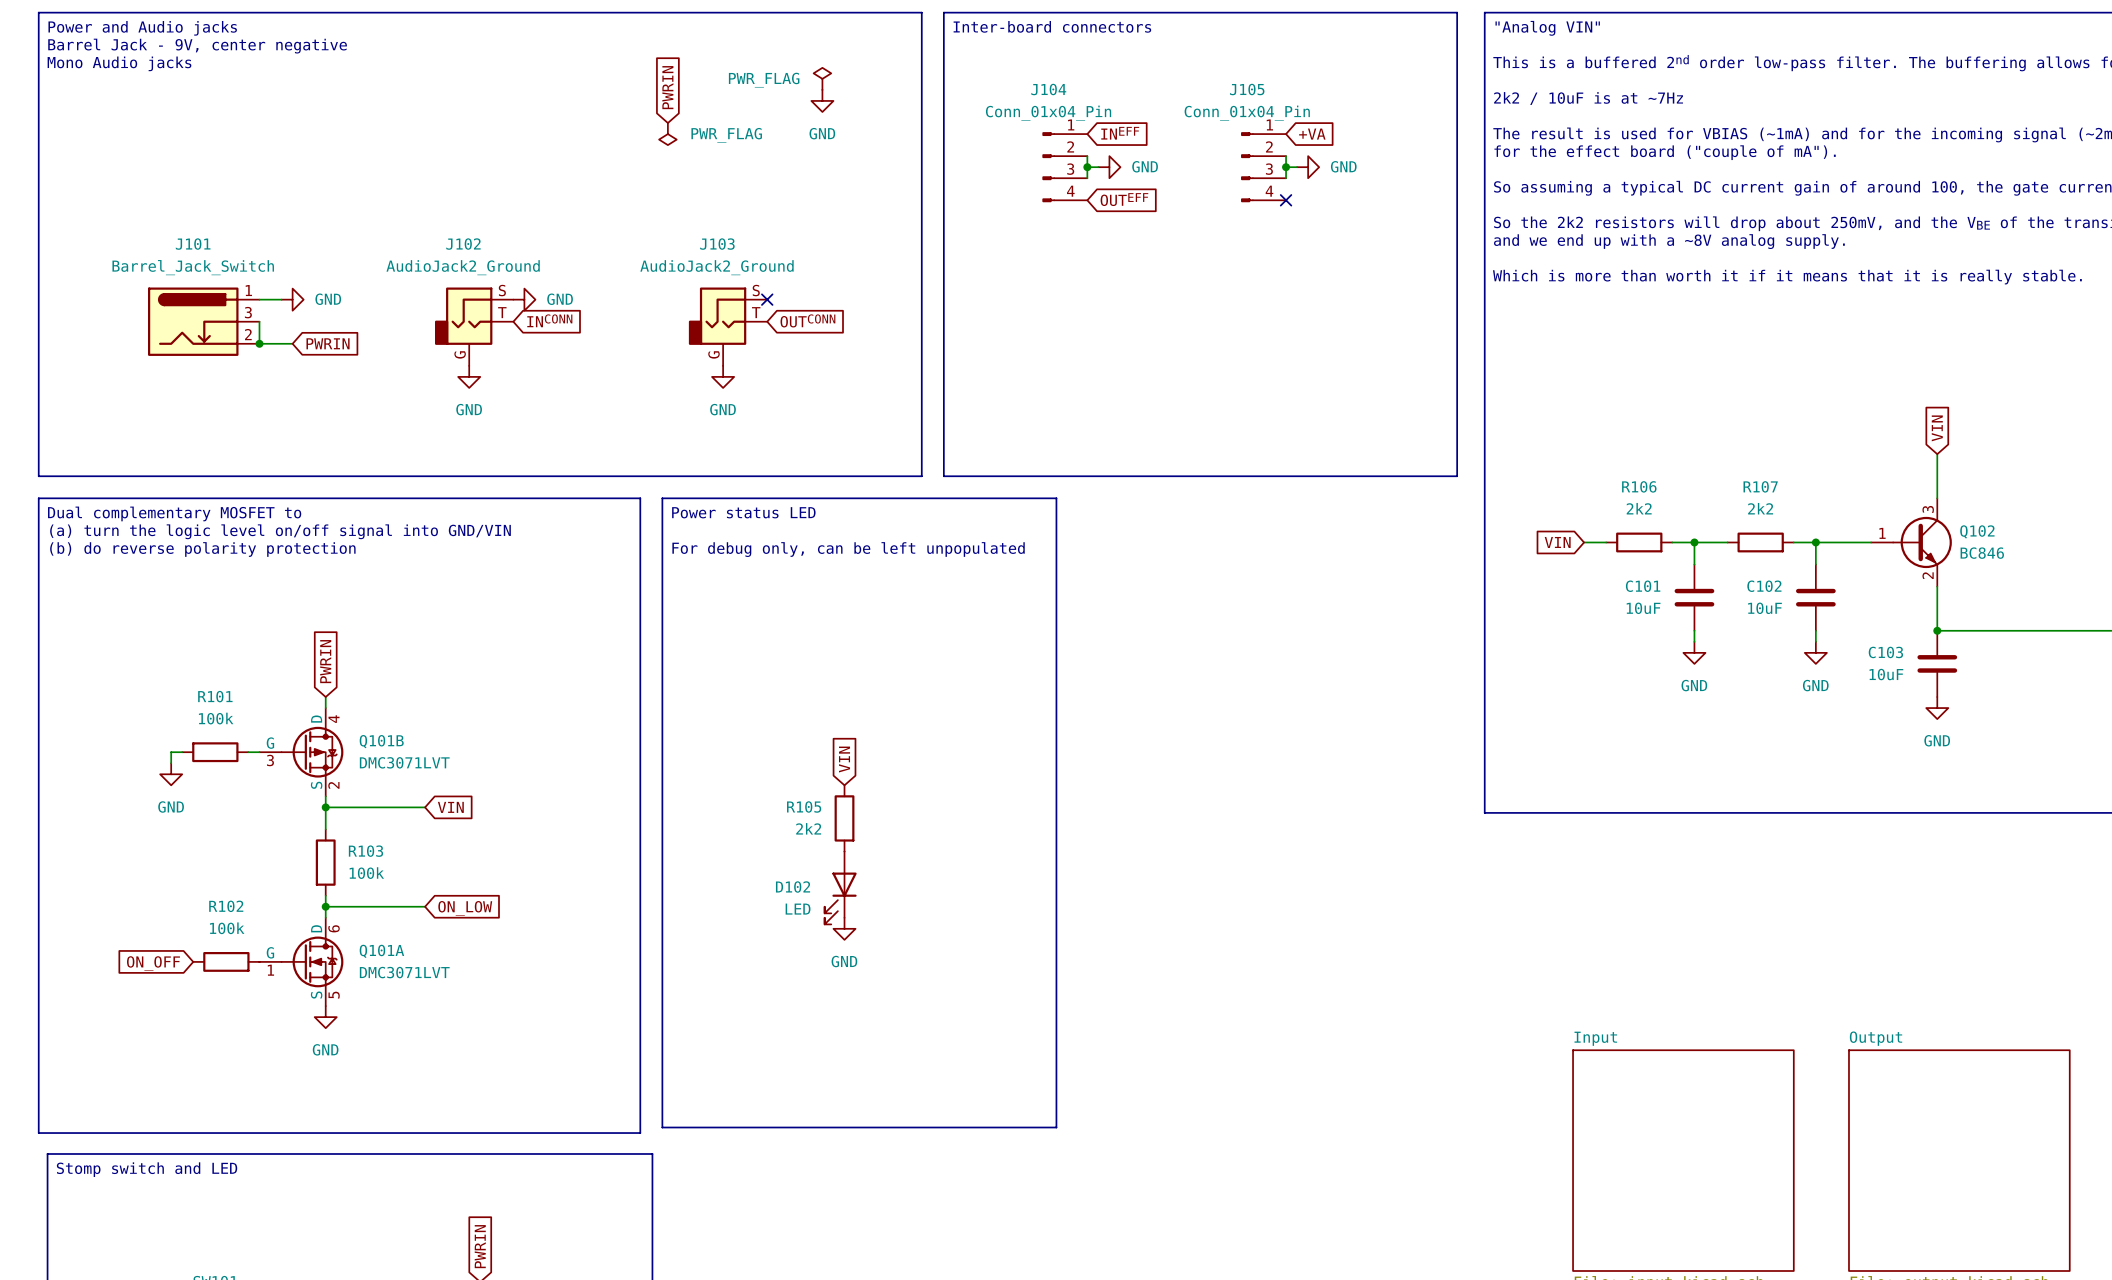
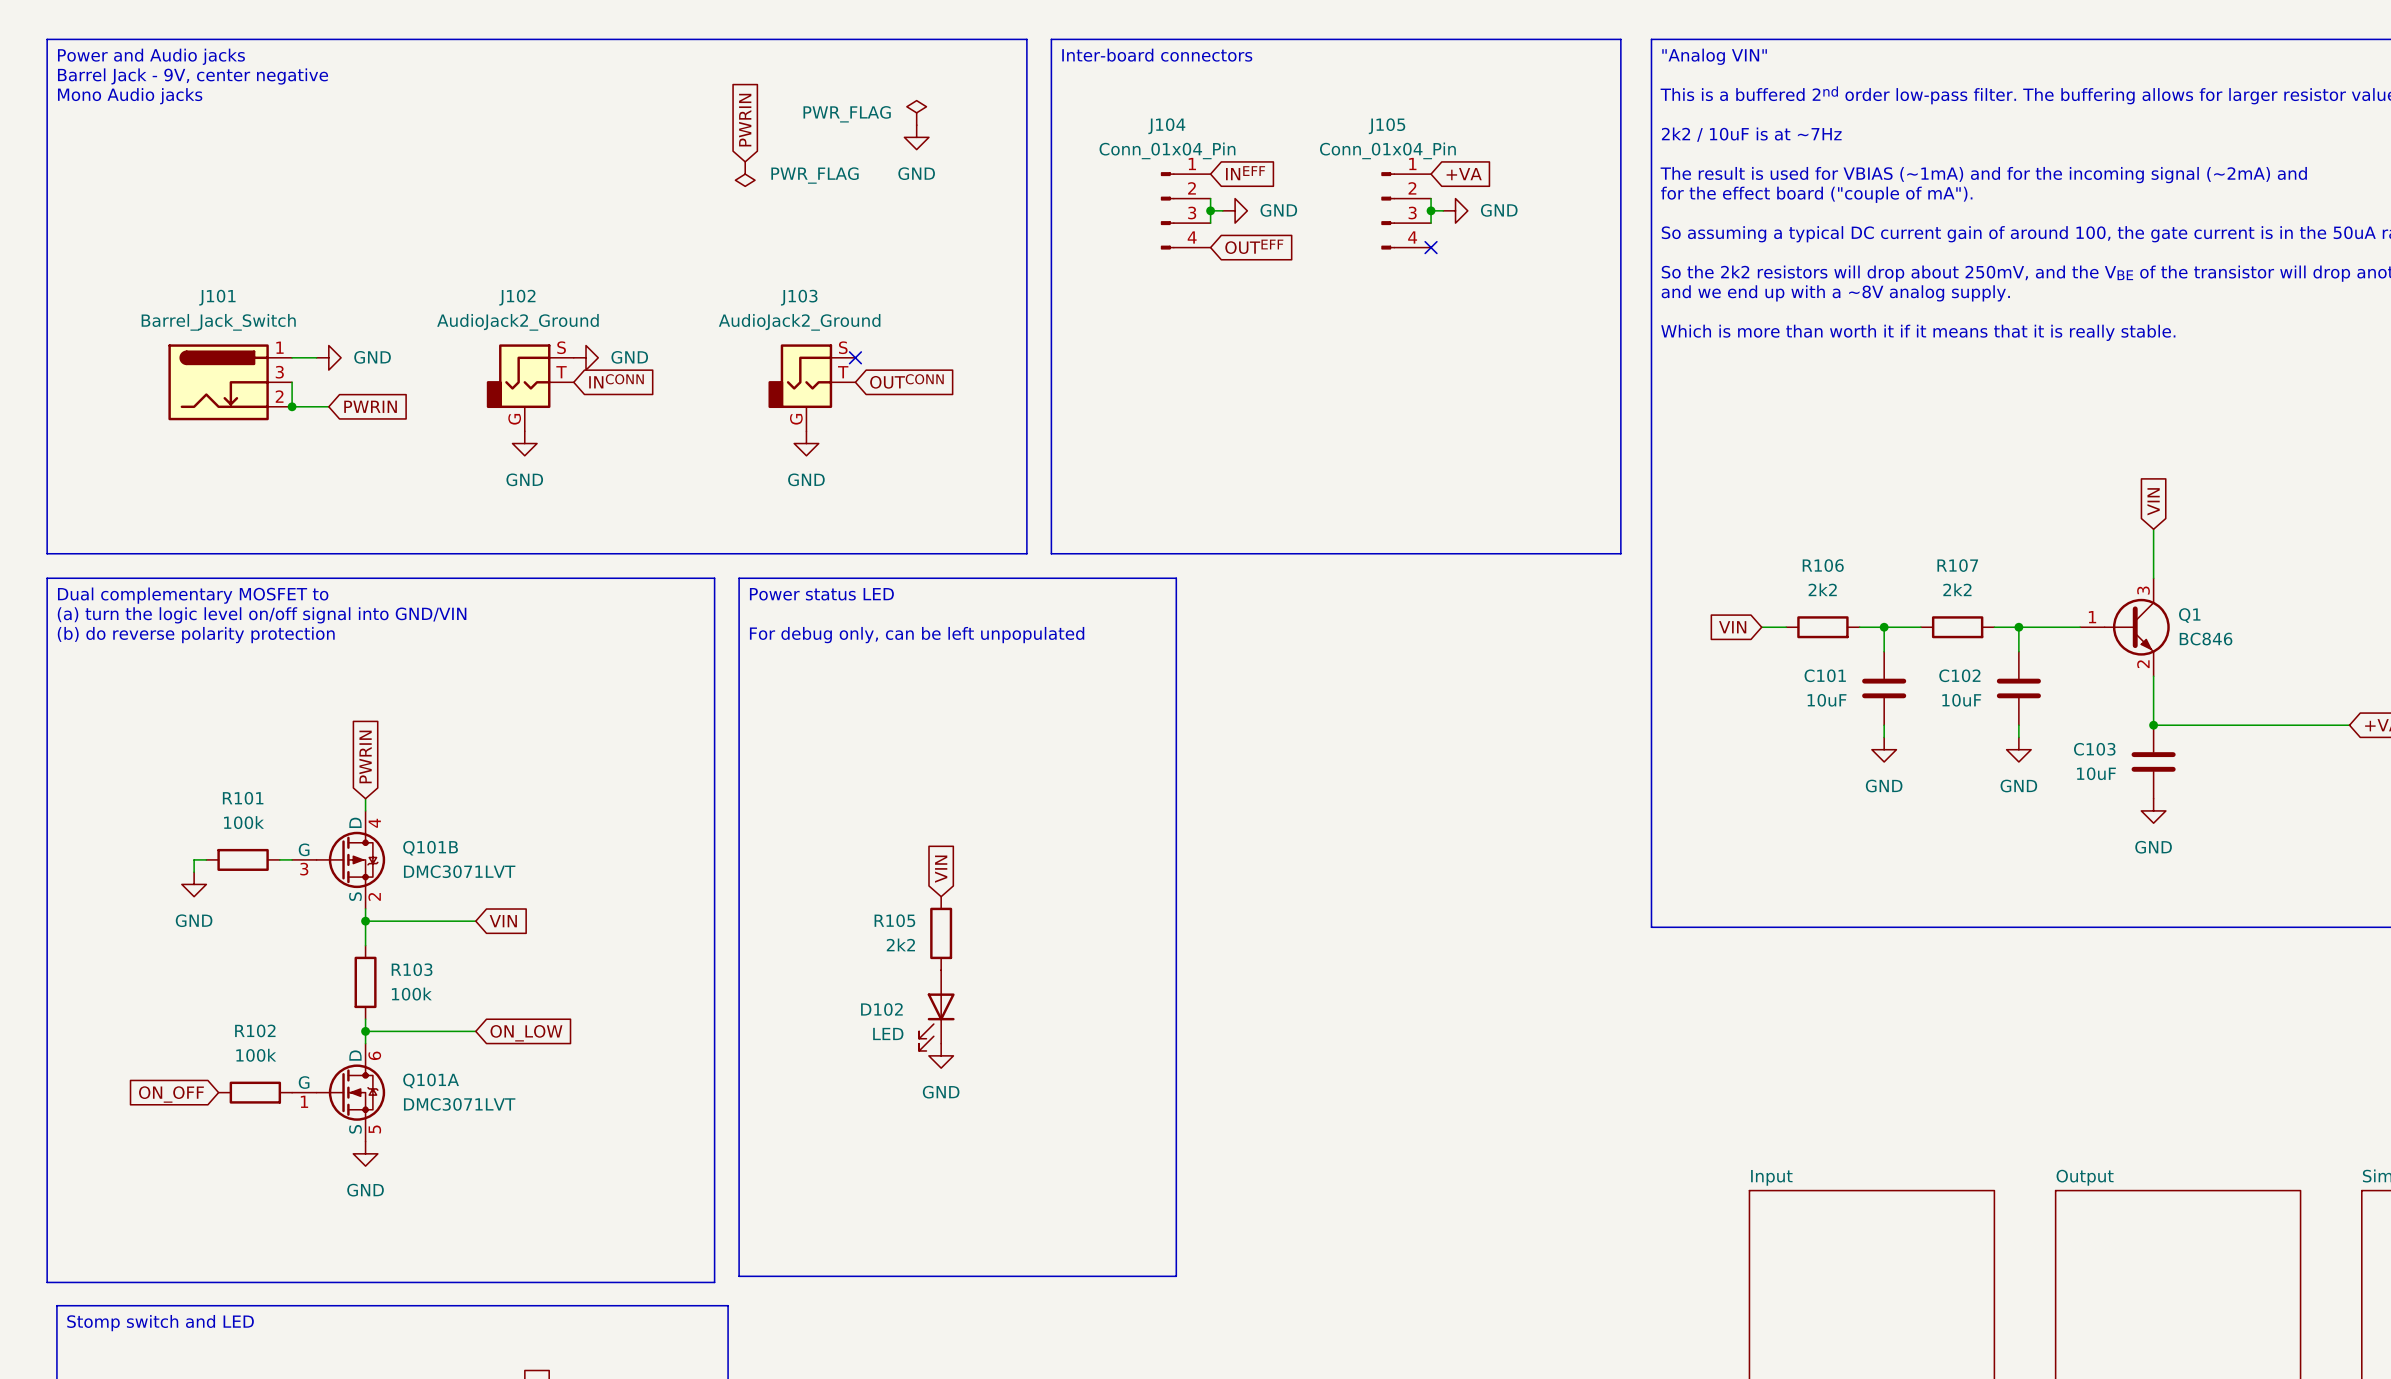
Q102 name: Q102 (1977, 531) -> Q1 (2189, 615)

